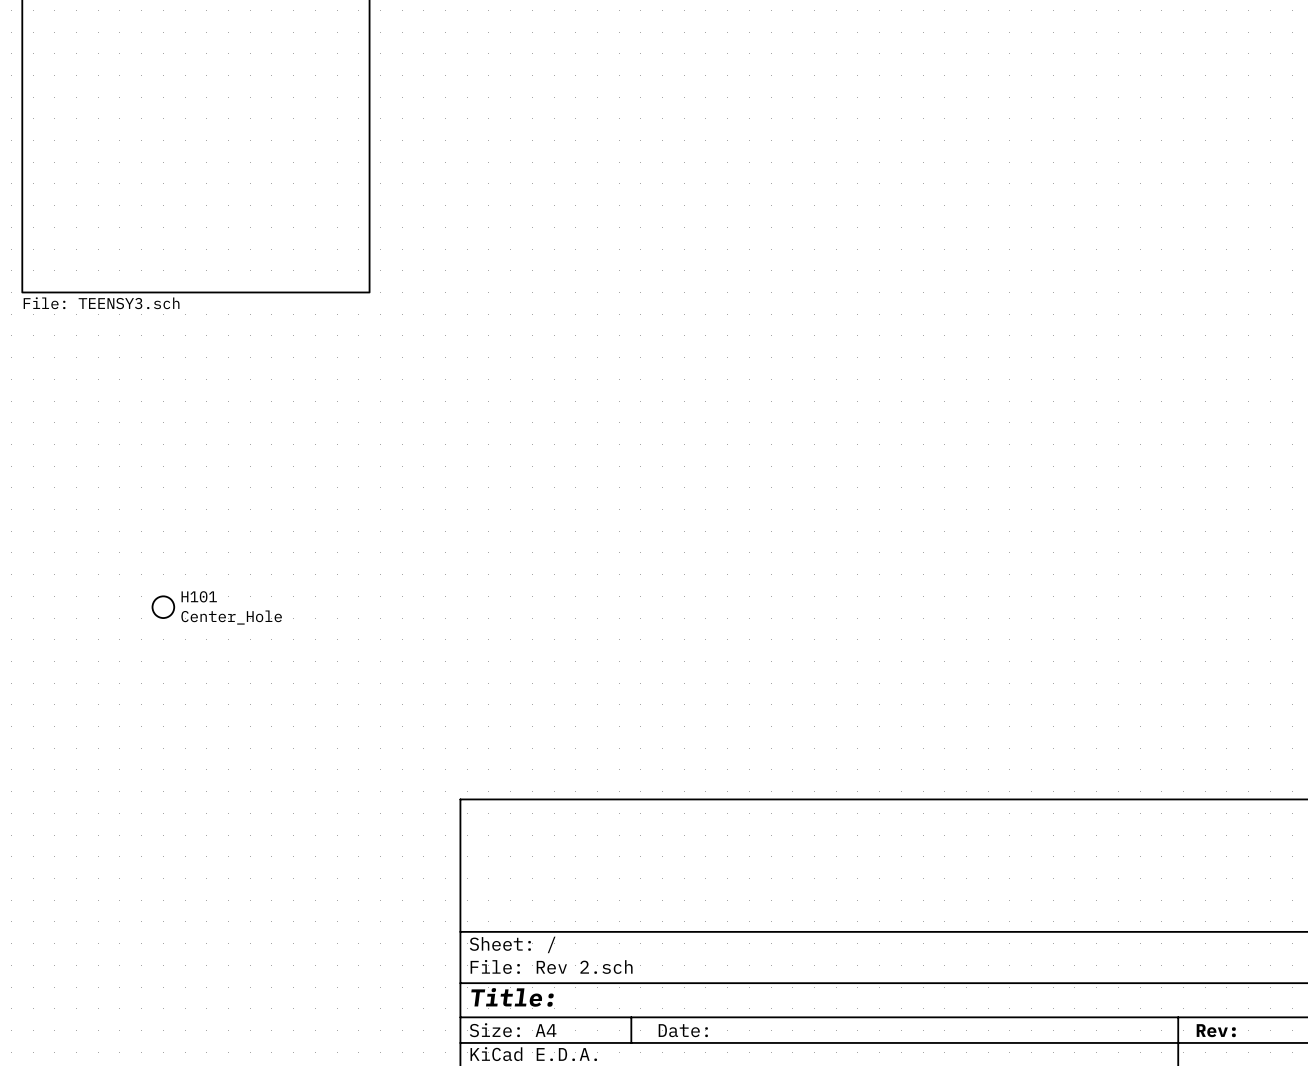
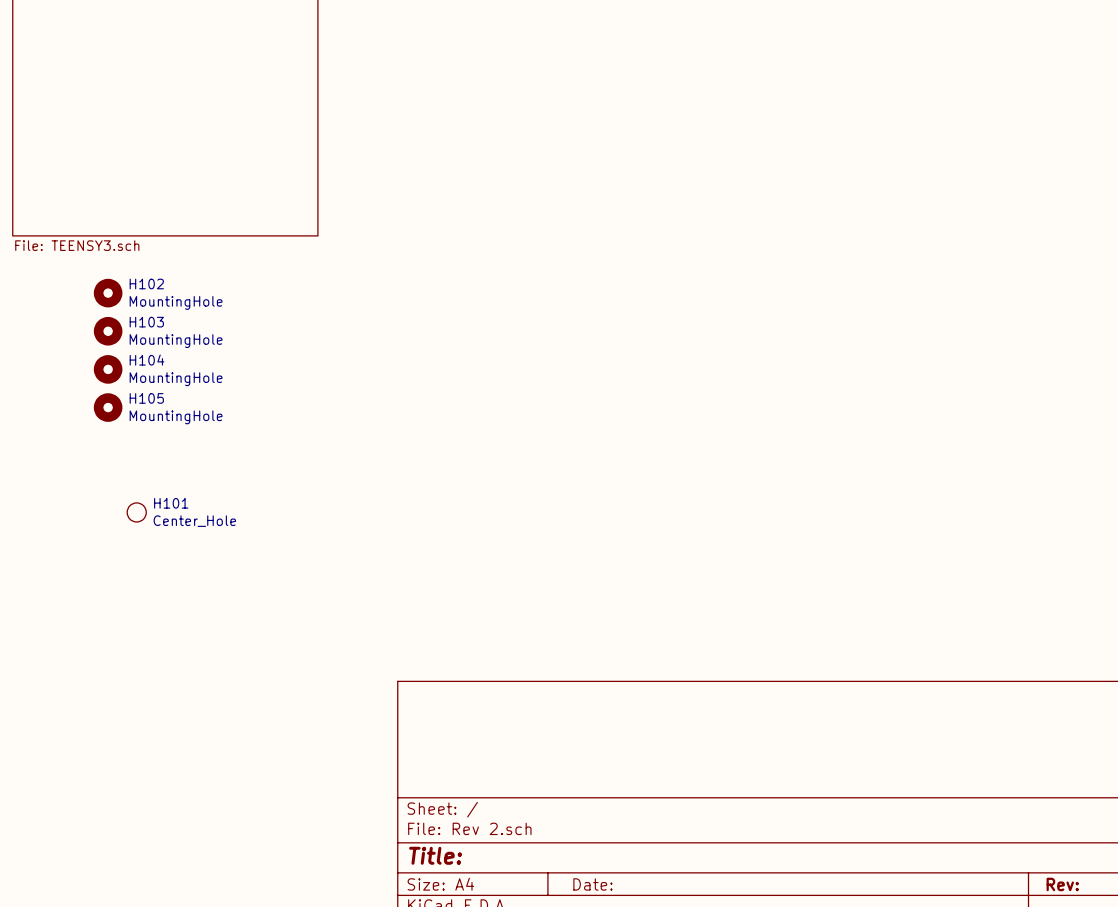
H102: none -> MountingHole (108, 293)
H103: none -> MountingHole (108, 331)
H104: none -> MountingHole (108, 369)
H105: none -> MountingHole (108, 407)

